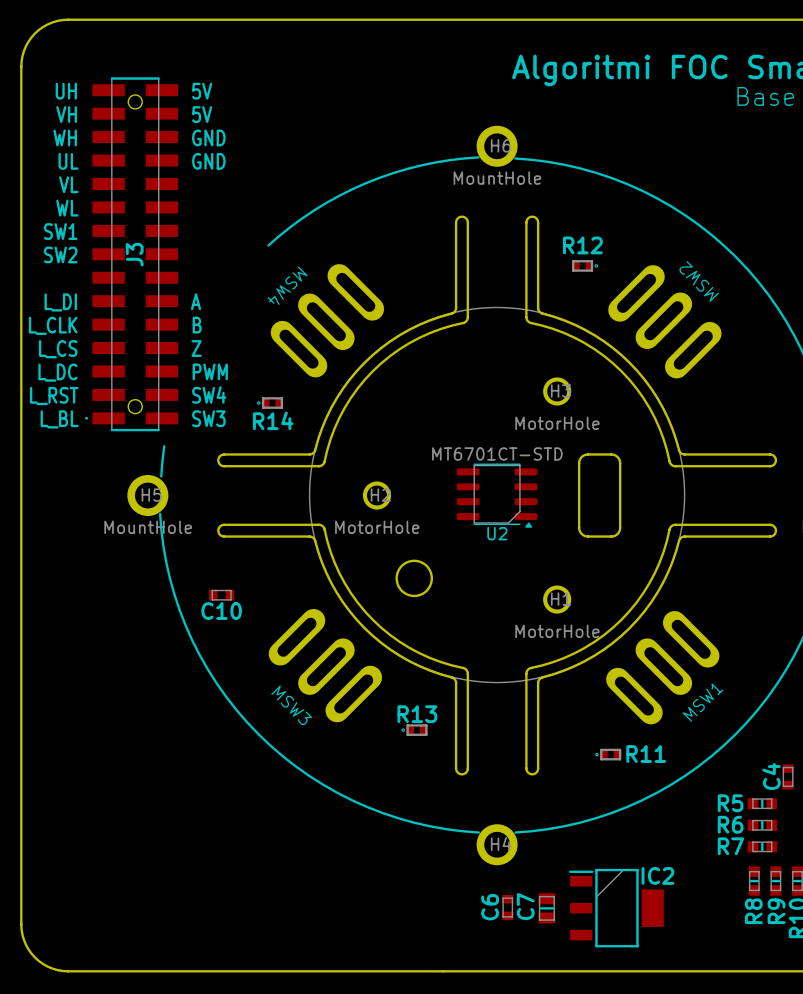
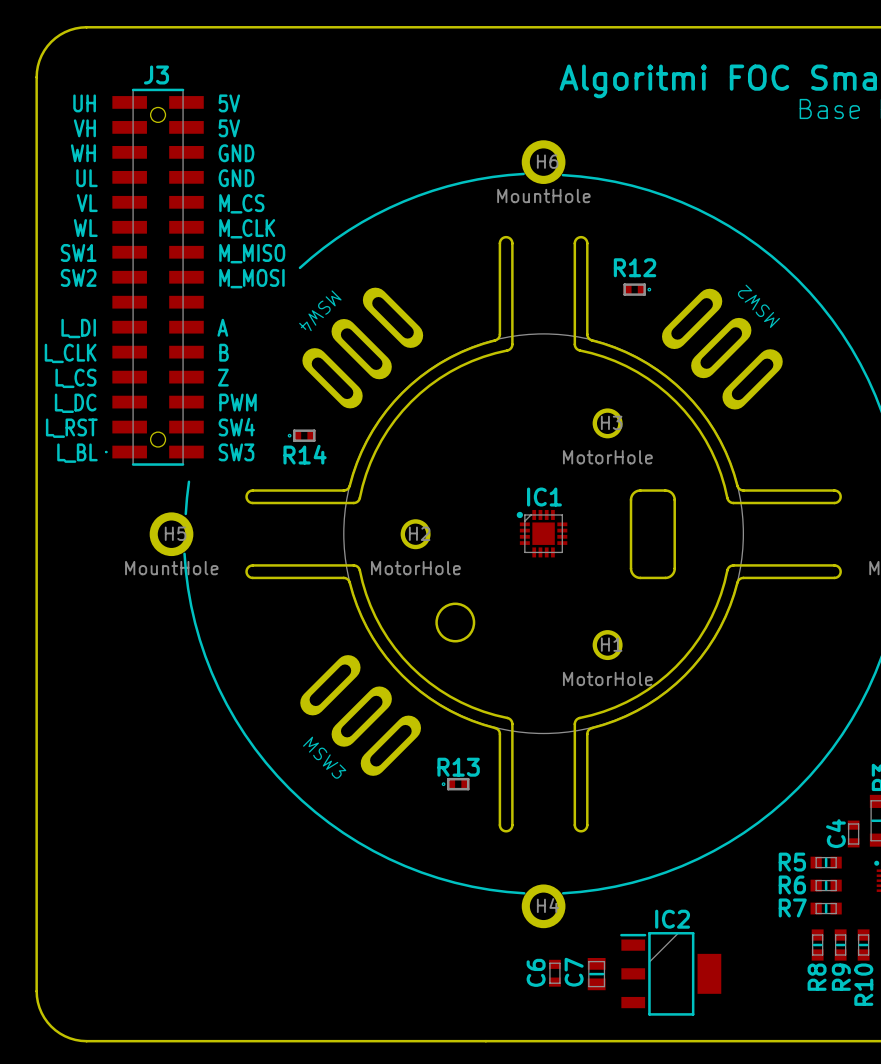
text: none -> M_CS (241, 203)
text: none -> M_CLK (247, 228)
text: none -> M_MISO (252, 253)
J3 name rotation: 0° (134, 254) -> 90° clockwise (156, 74)
J3 name position: J3 (134, 254) -> J3 (156, 74)
text: none -> M_MOSI (251, 278)
IC1: none -> (542, 533)
U2: MT6701CT-STD (497, 495) -> none
C10: (221, 595) -> none
MSW1: (662, 667) -> none
R11: (608, 754) -> none
IC2 name position: IC2 (657, 875) -> IC2 (672, 919)

